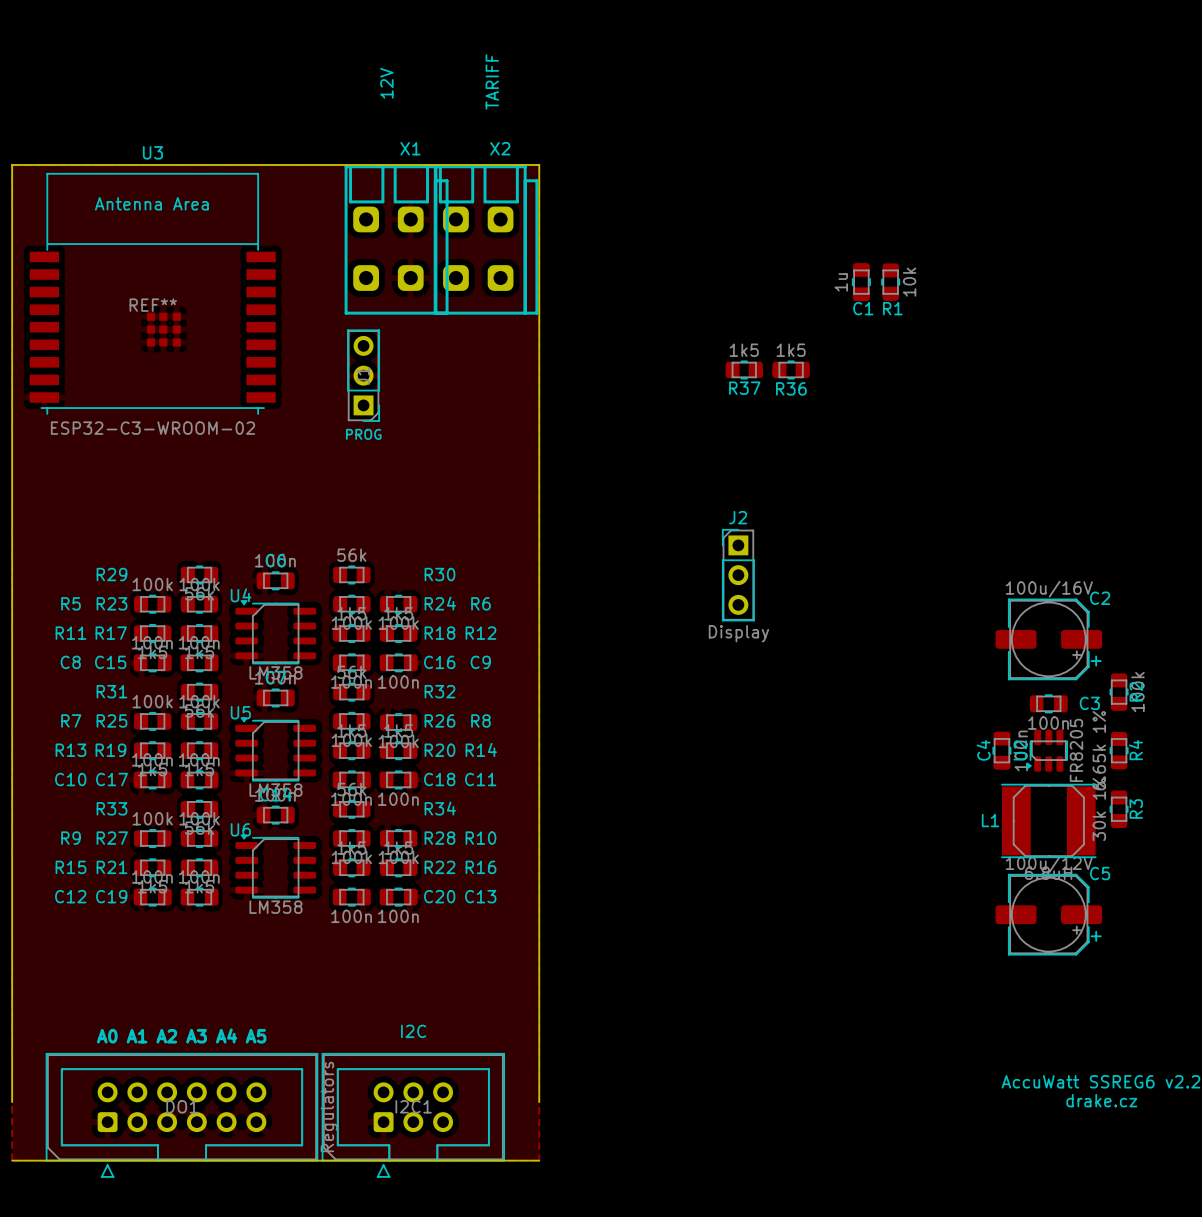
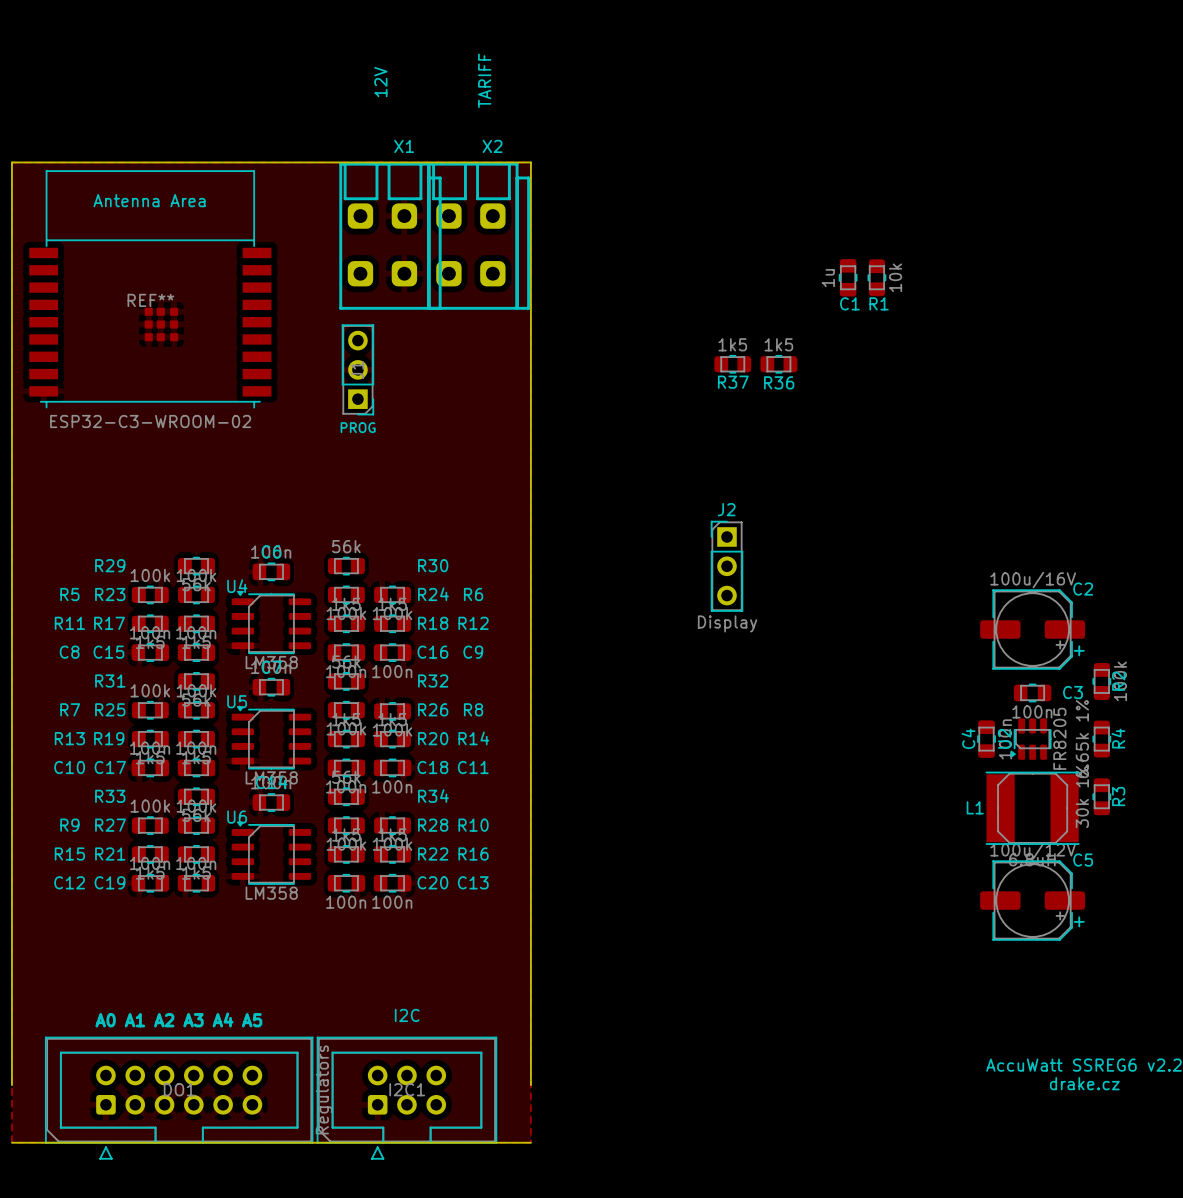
U3 name: U3 (152, 152) -> none

